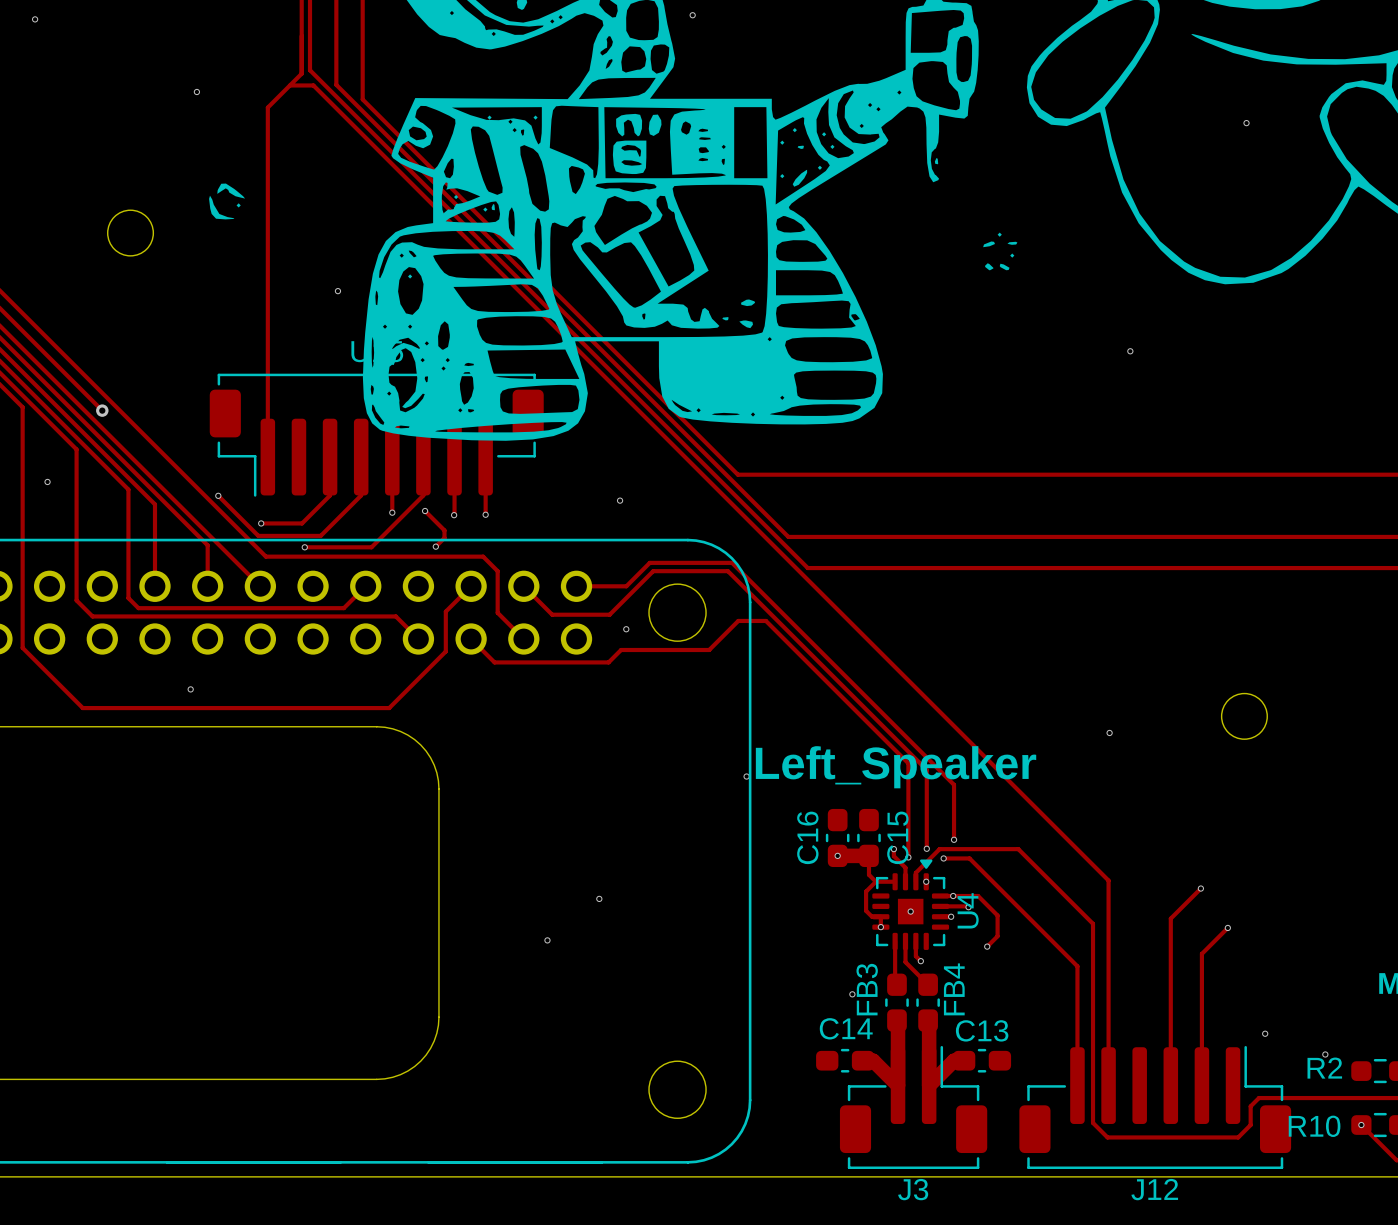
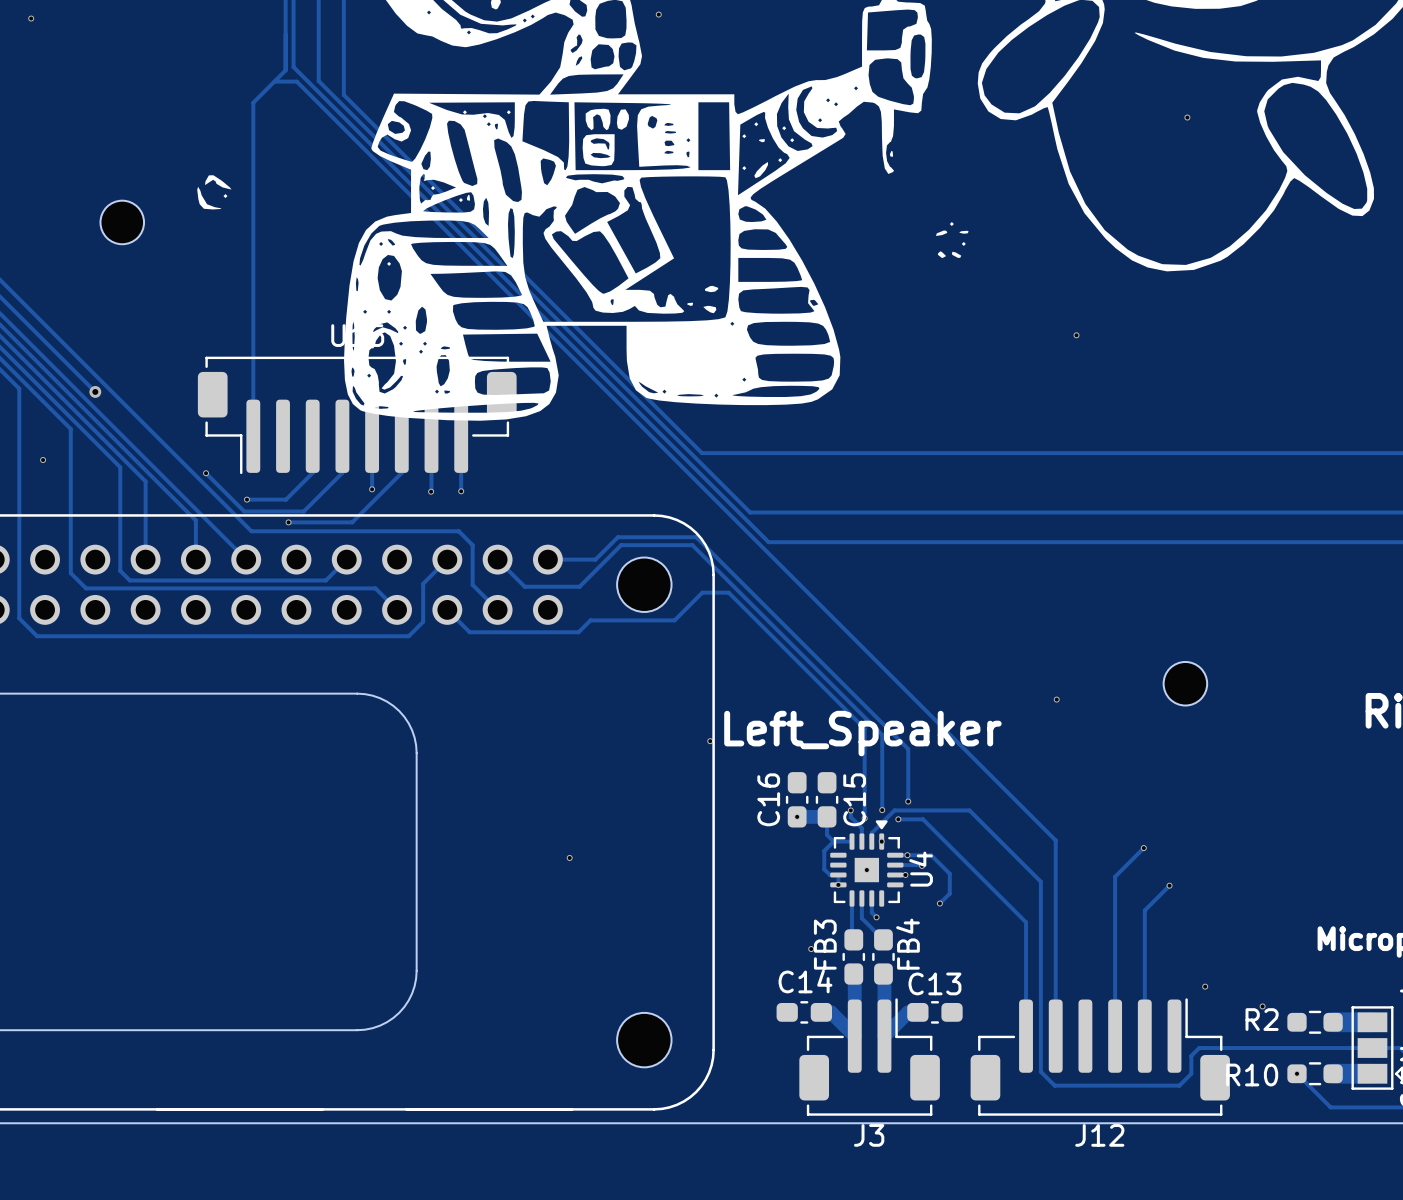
via: (196, 91) -> none
via: (337, 291) -> none
via: (620, 500) -> none
track: (425, 511) (444, 530) (444, 537) (435, 546) -> none
via: (425, 511) -> none
via: (435, 546) -> none
via: (626, 629) -> none
track: (41, 666) (82, 708) (389, 708) (430, 666) -> (37, 636) (408, 636)
via: (190, 689) -> none
via: (547, 940) -> none

